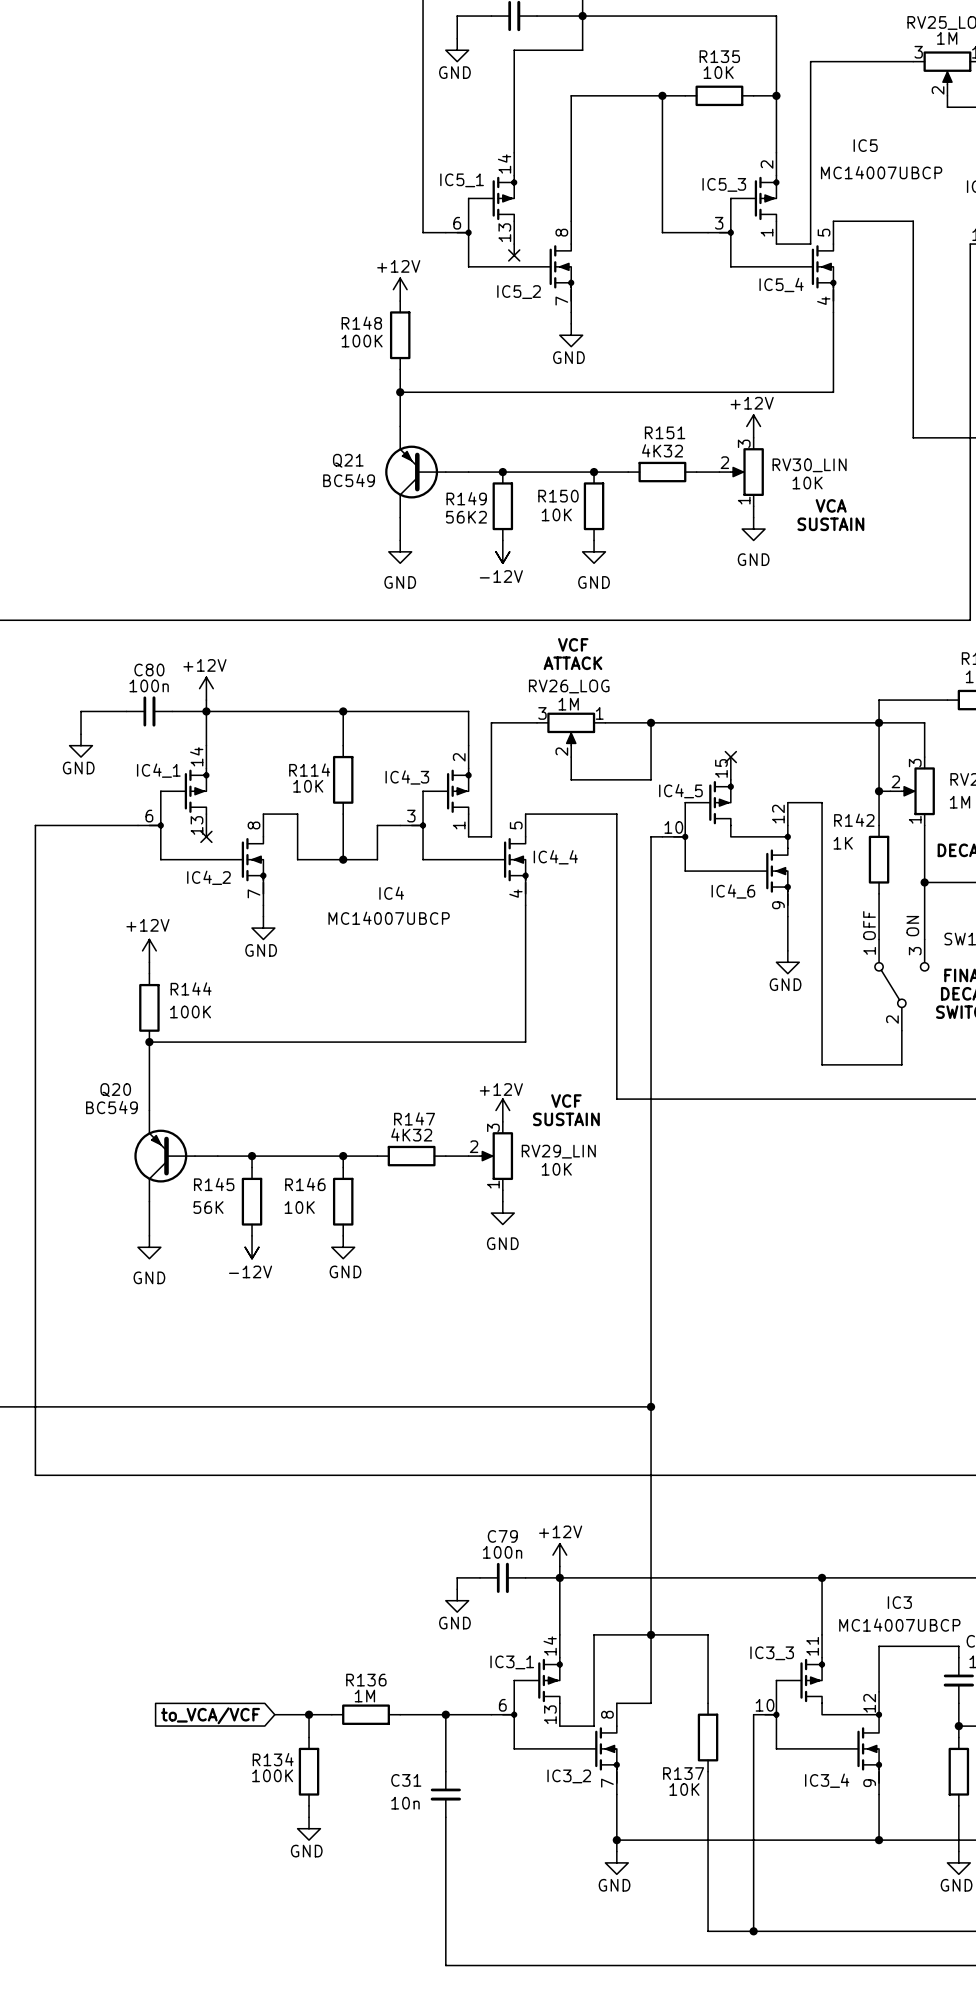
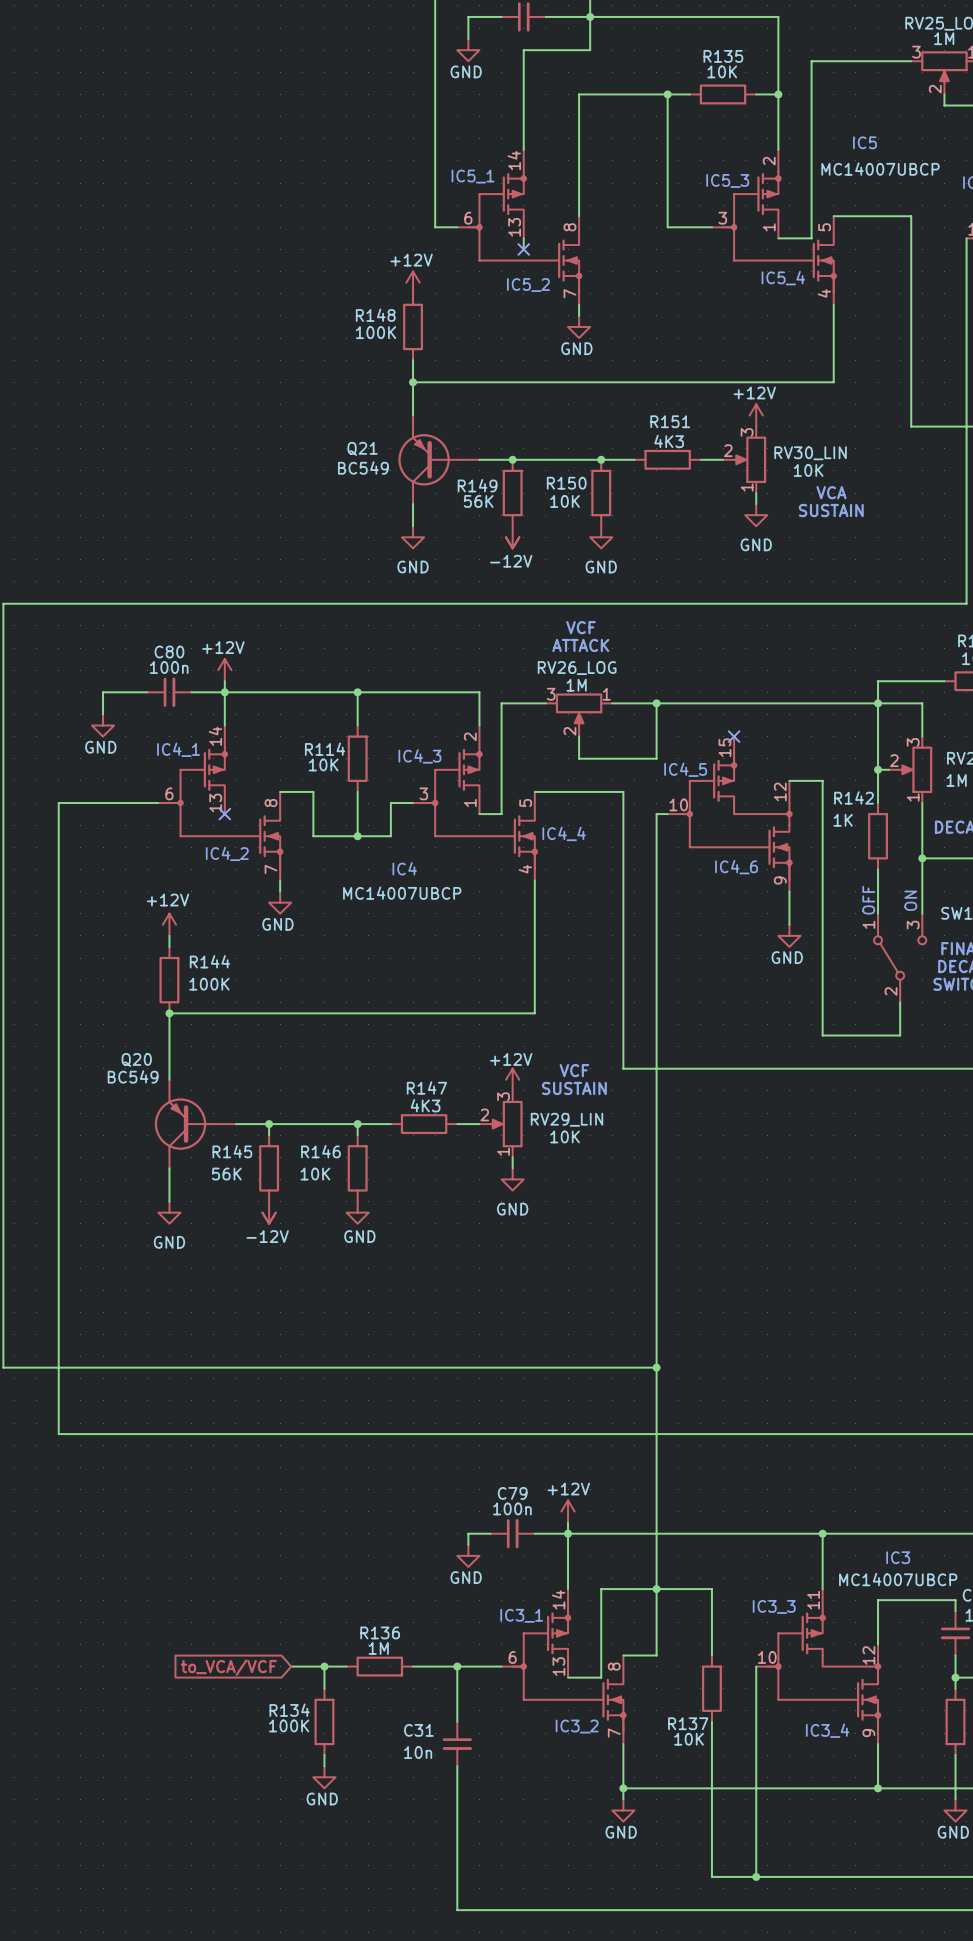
R151 value: 4K32 (662, 450) -> 4K3 (669, 441)
R149 value: 56K2 (466, 517) -> 56K (478, 501)
R147 value: 4K32 (411, 1134) -> 4K3 (425, 1105)

